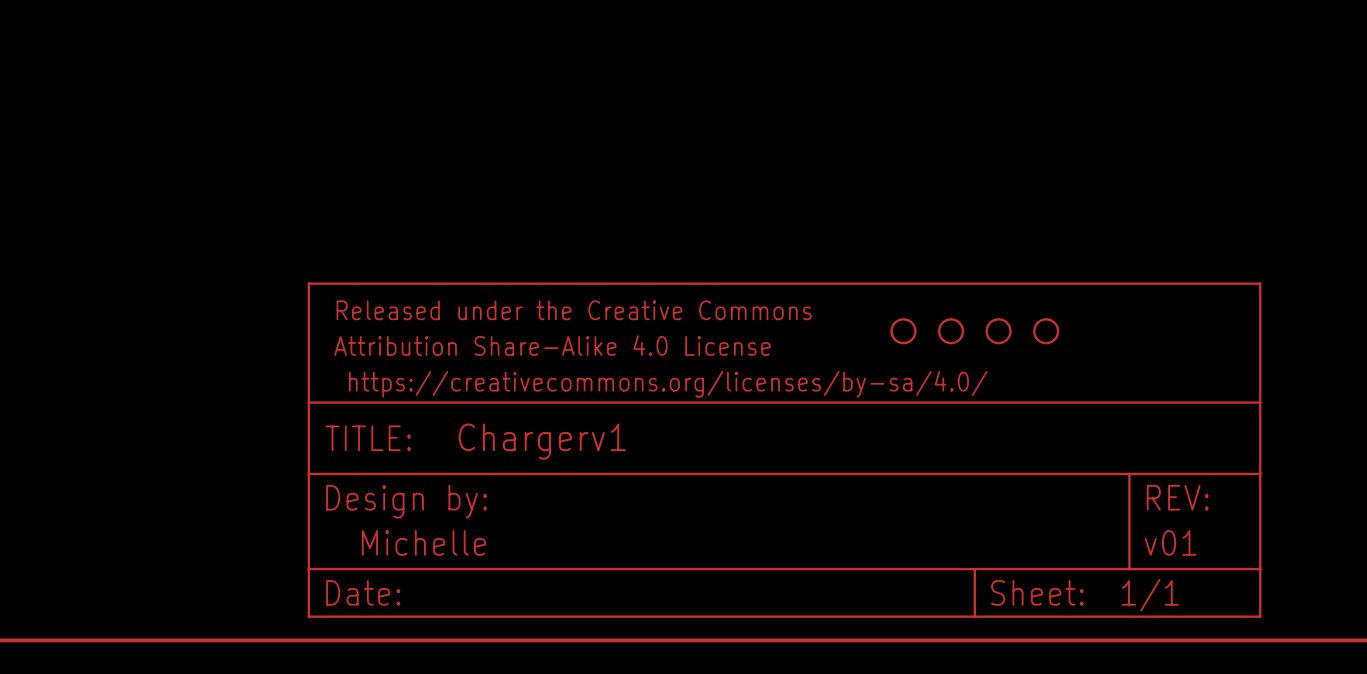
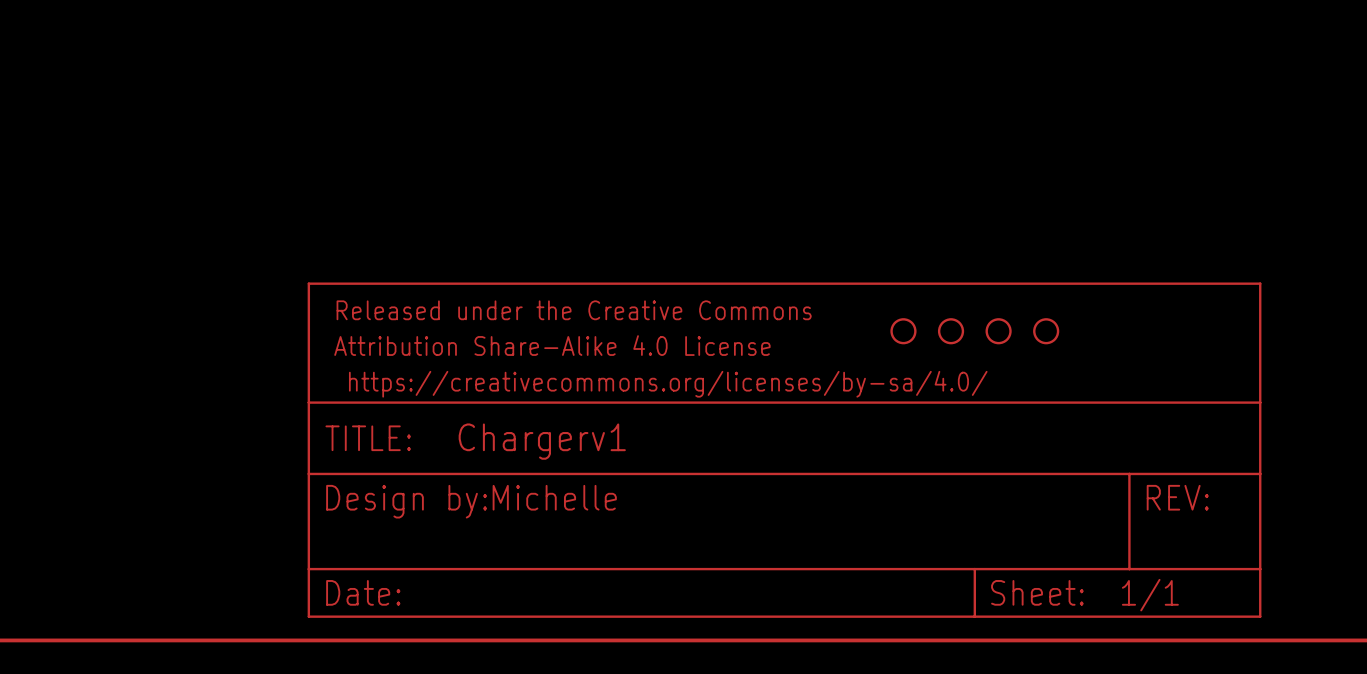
part text position: Michelle (423, 542) -> Michelle (554, 497)
part text: v01 (1170, 542) -> none

